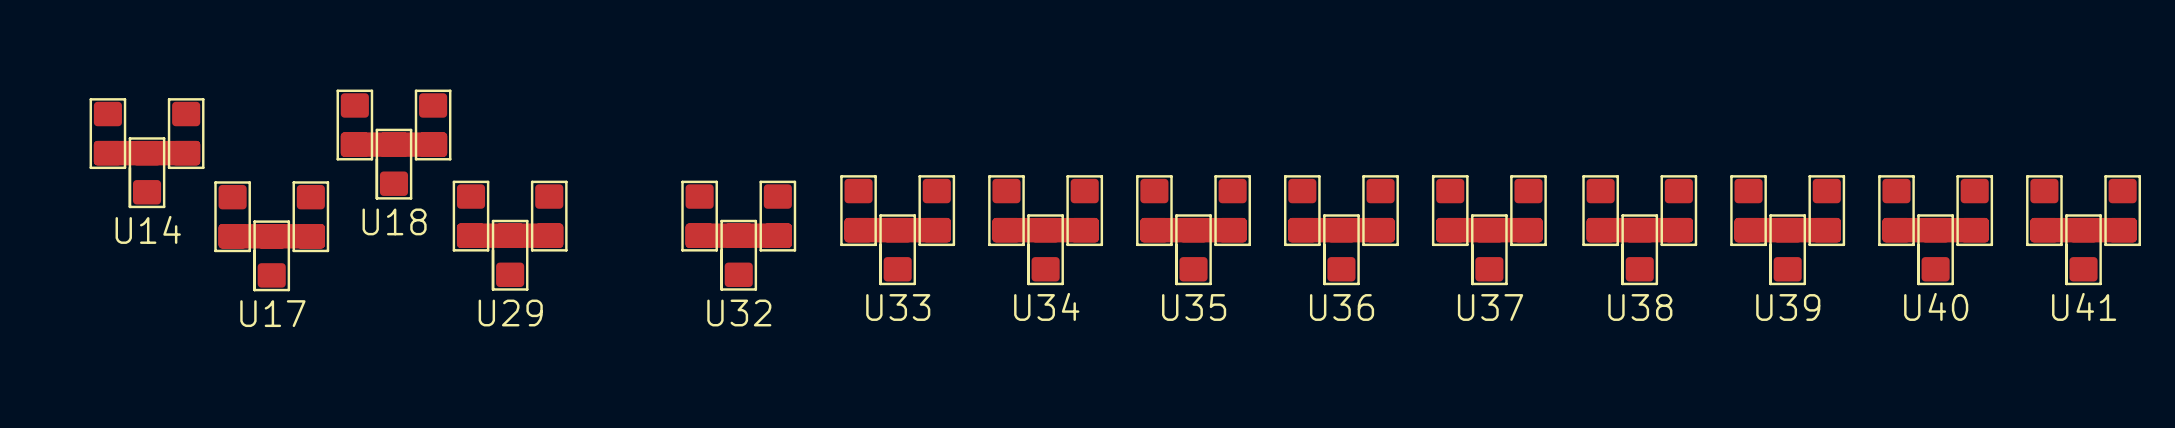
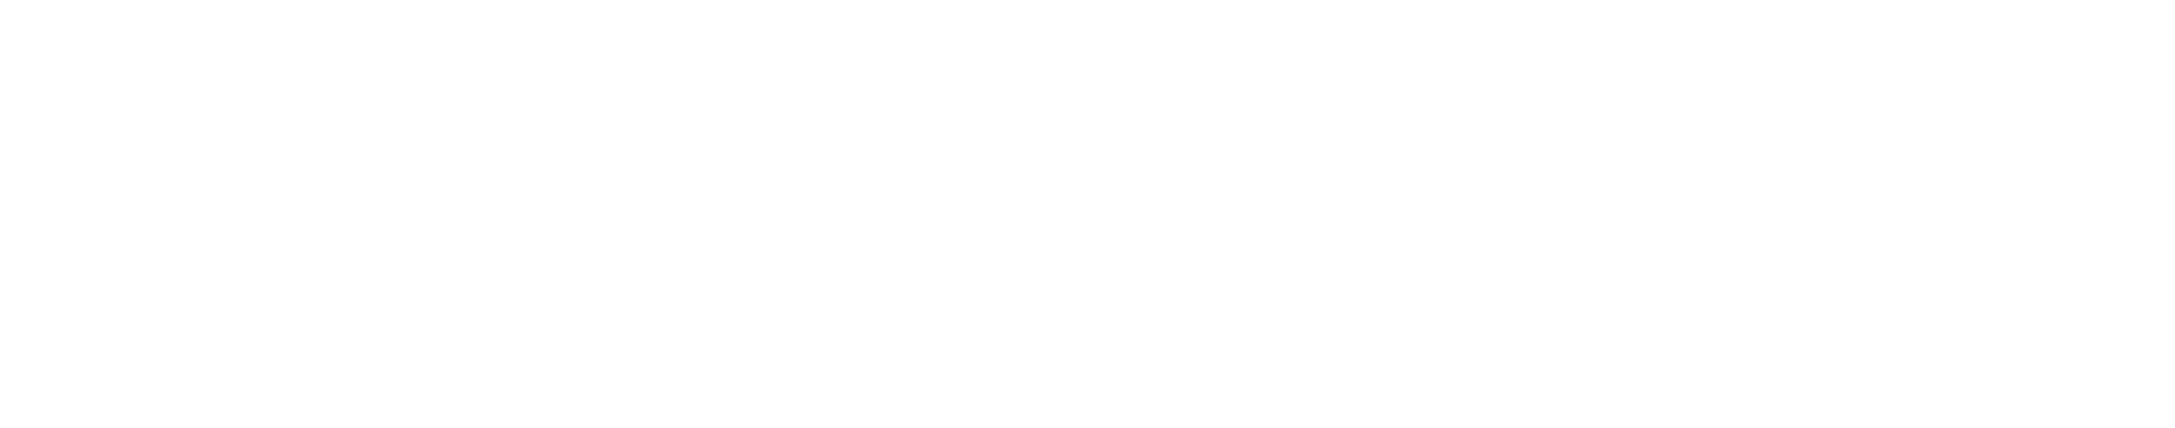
U18: (393, 144) -> none
U14: (147, 153) -> none
U33: (897, 230) -> none
U34: (1045, 230) -> none
U35: (1193, 230) -> none
U36: (1341, 230) -> none
U37: (1489, 230) -> none
U38: (1639, 230) -> none
U39: (1787, 230) -> none
U40: (1935, 230) -> none
U41: (2083, 230) -> none
U29: (510, 235) -> none
U32: (738, 235) -> none
U17: (271, 236) -> none

